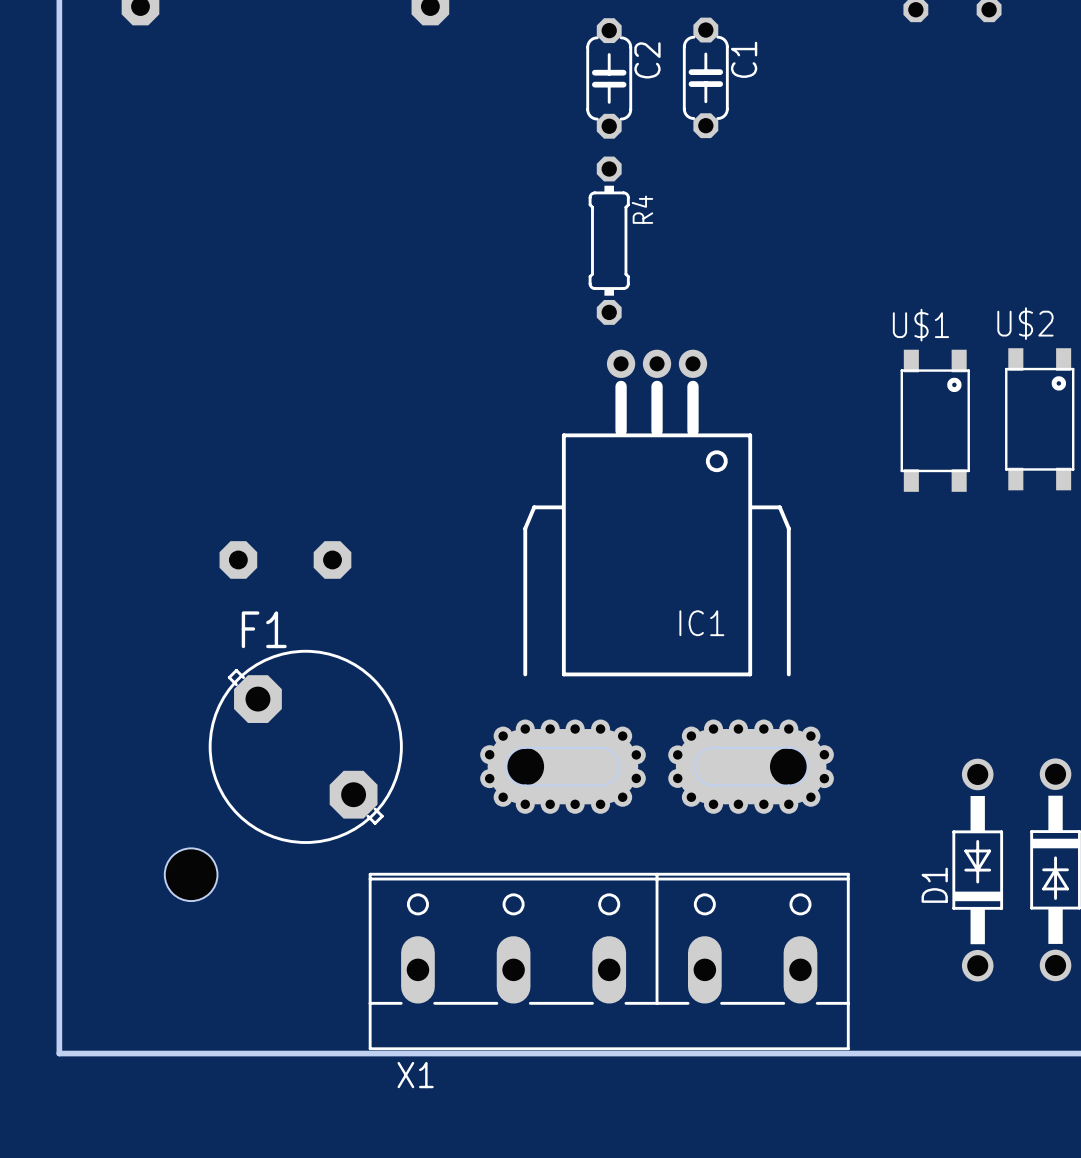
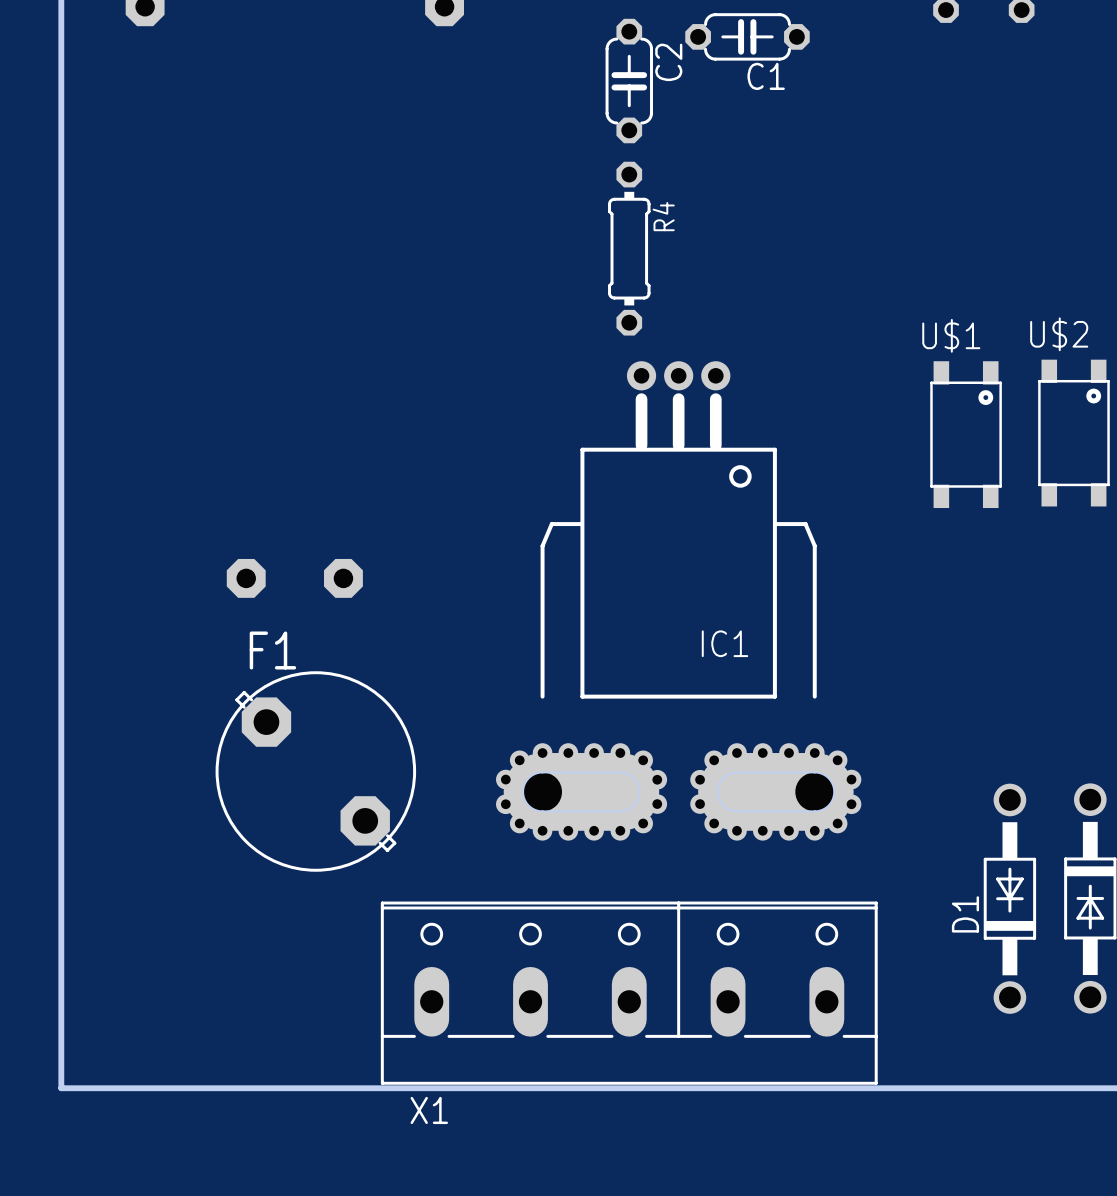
C1 rotation: 0° (705, 77) -> 90° clockwise (747, 36)
hole: (191, 874) -> none

